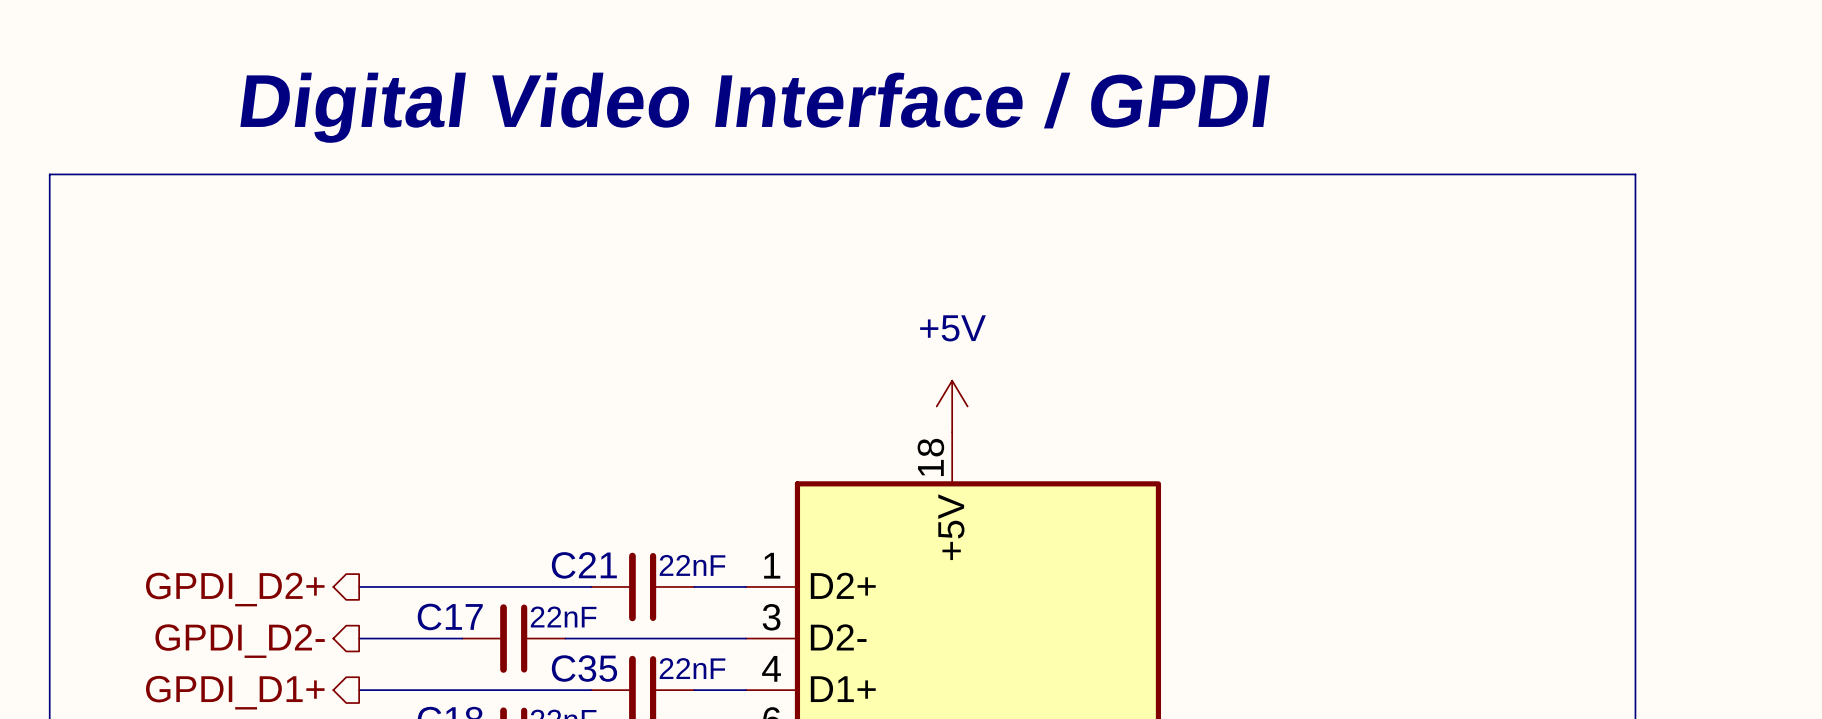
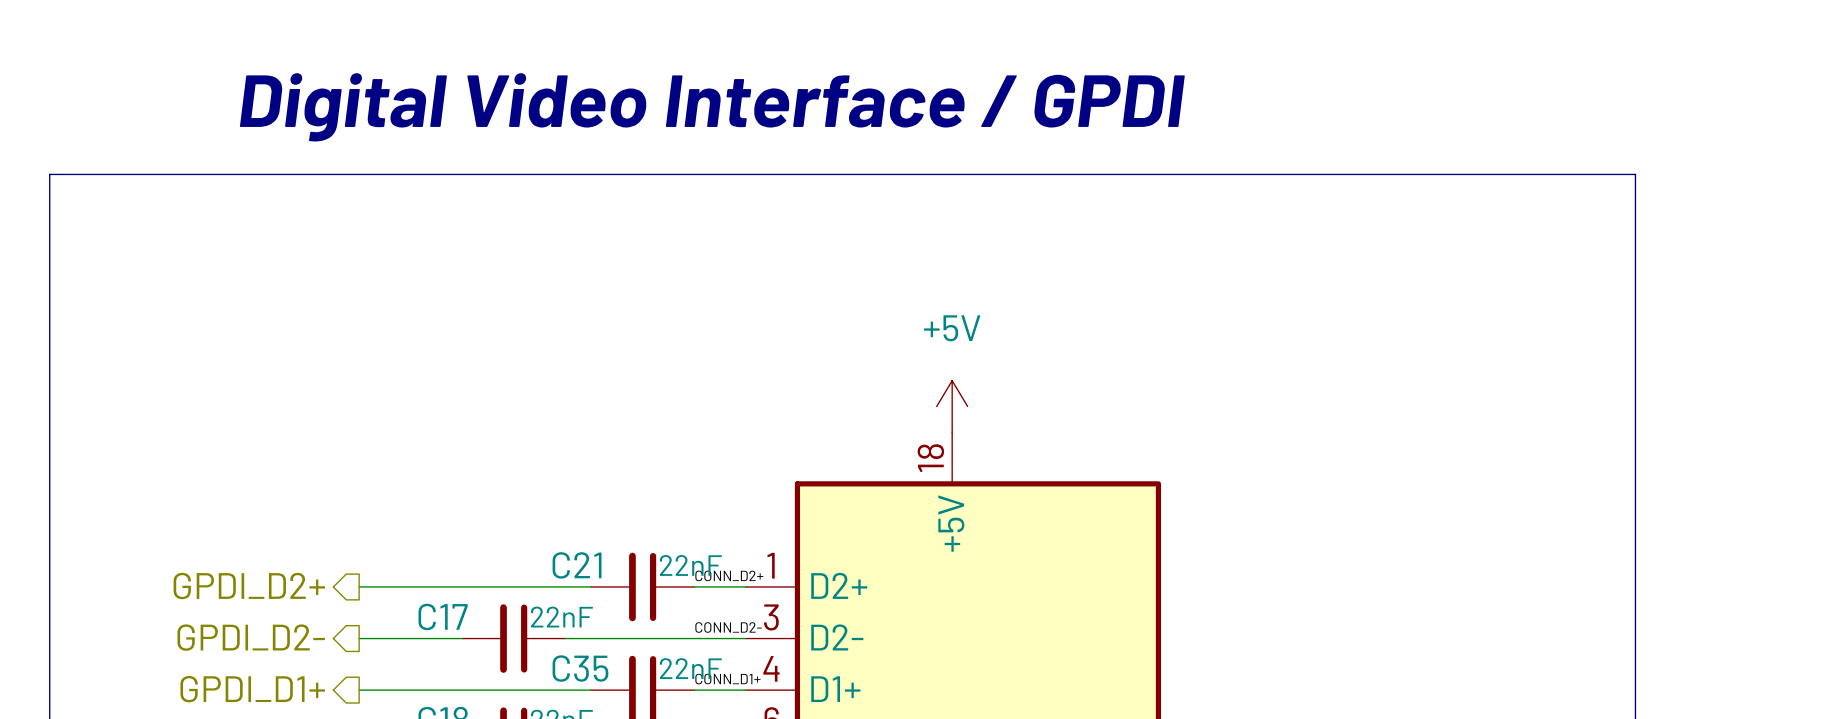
label: none -> CONN_D2+ (729, 575)
label: none -> CONN_D2- (728, 627)
label: none -> CONN_D1+ (727, 679)

